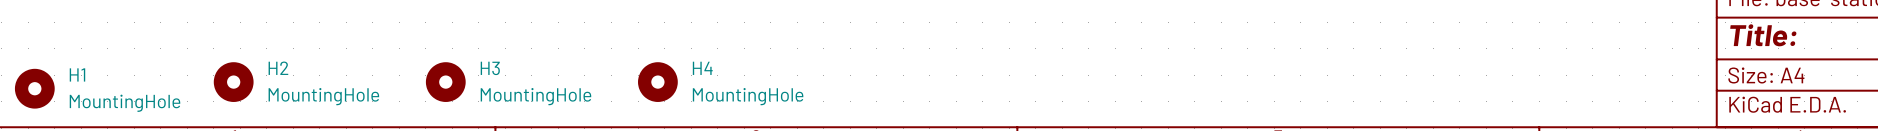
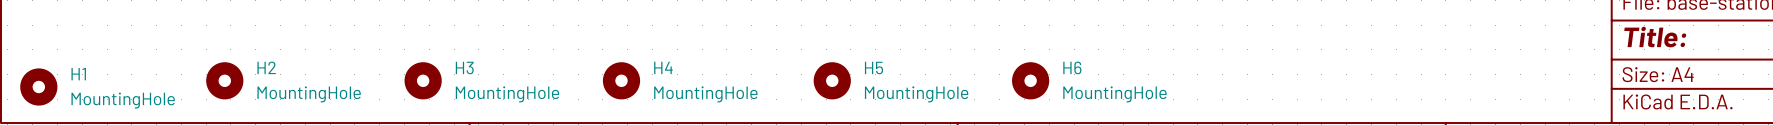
H5: none -> MountingHole (832, 80)
H6: none -> MountingHole (1030, 80)

